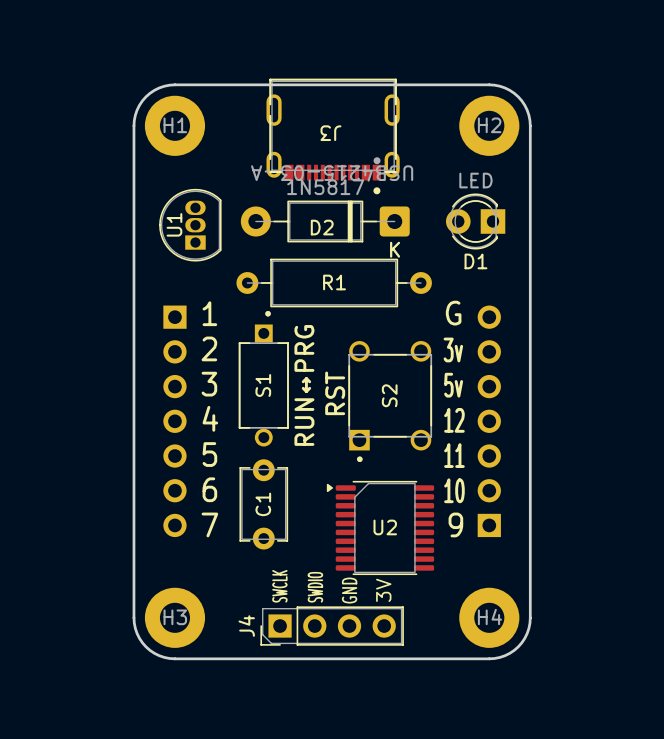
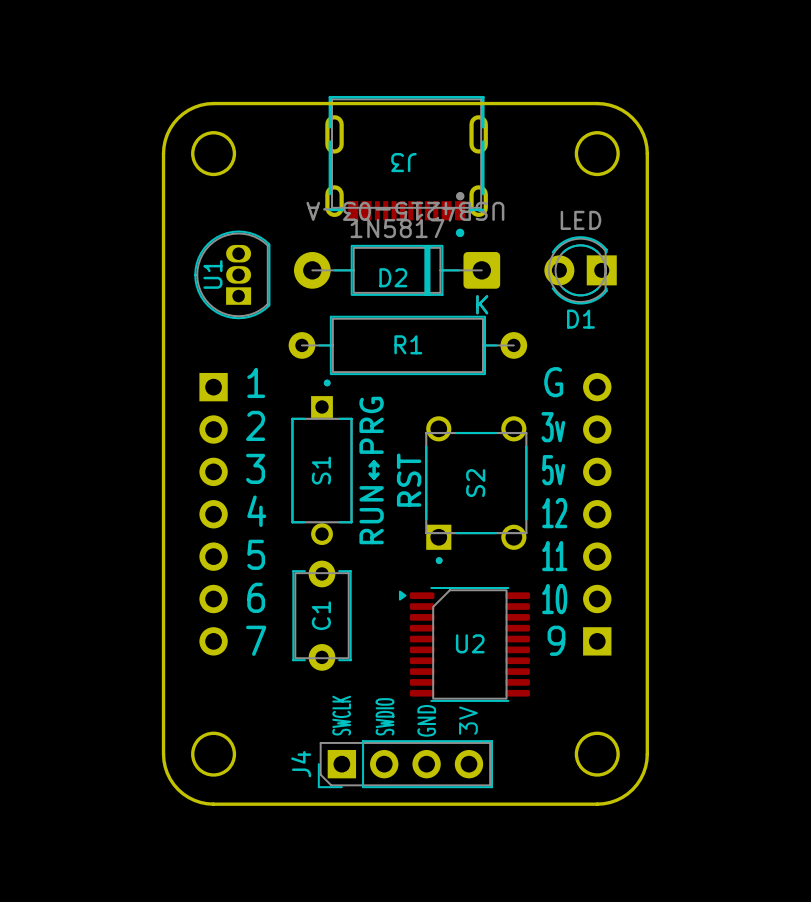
round board edge: none -> [191, 131, 237, 177]
round board edge: none -> [574, 131, 620, 177]
H1: (174, 125) -> none
H2: (489, 125) -> none
round board edge: none -> [191, 731, 237, 777]
round board edge: none -> [574, 731, 620, 777]
H3: (174, 617) -> none
H4: (489, 617) -> none

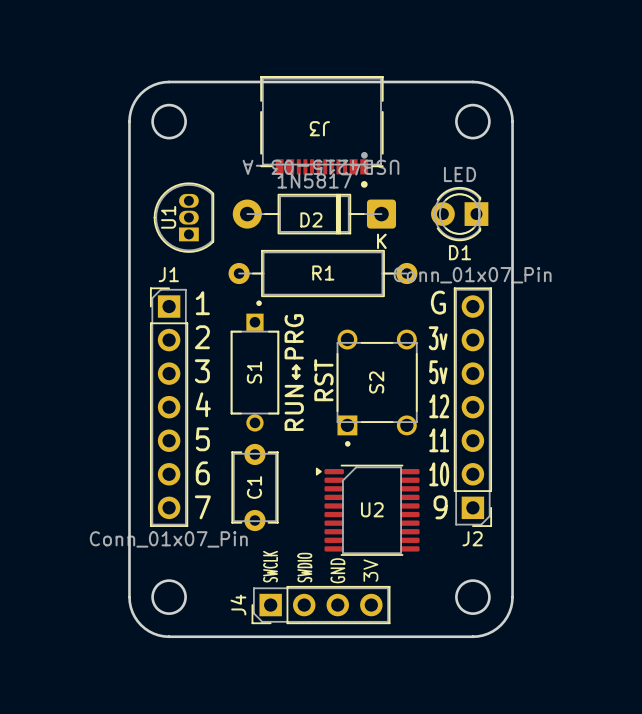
J3 footprint: [325, 95, 488, 238] -> [260, 75, 384, 188]
J1 side: bottom (213, 514) -> top (169, 407)
J2 side: bottom (597, 514) -> top (472, 407)

